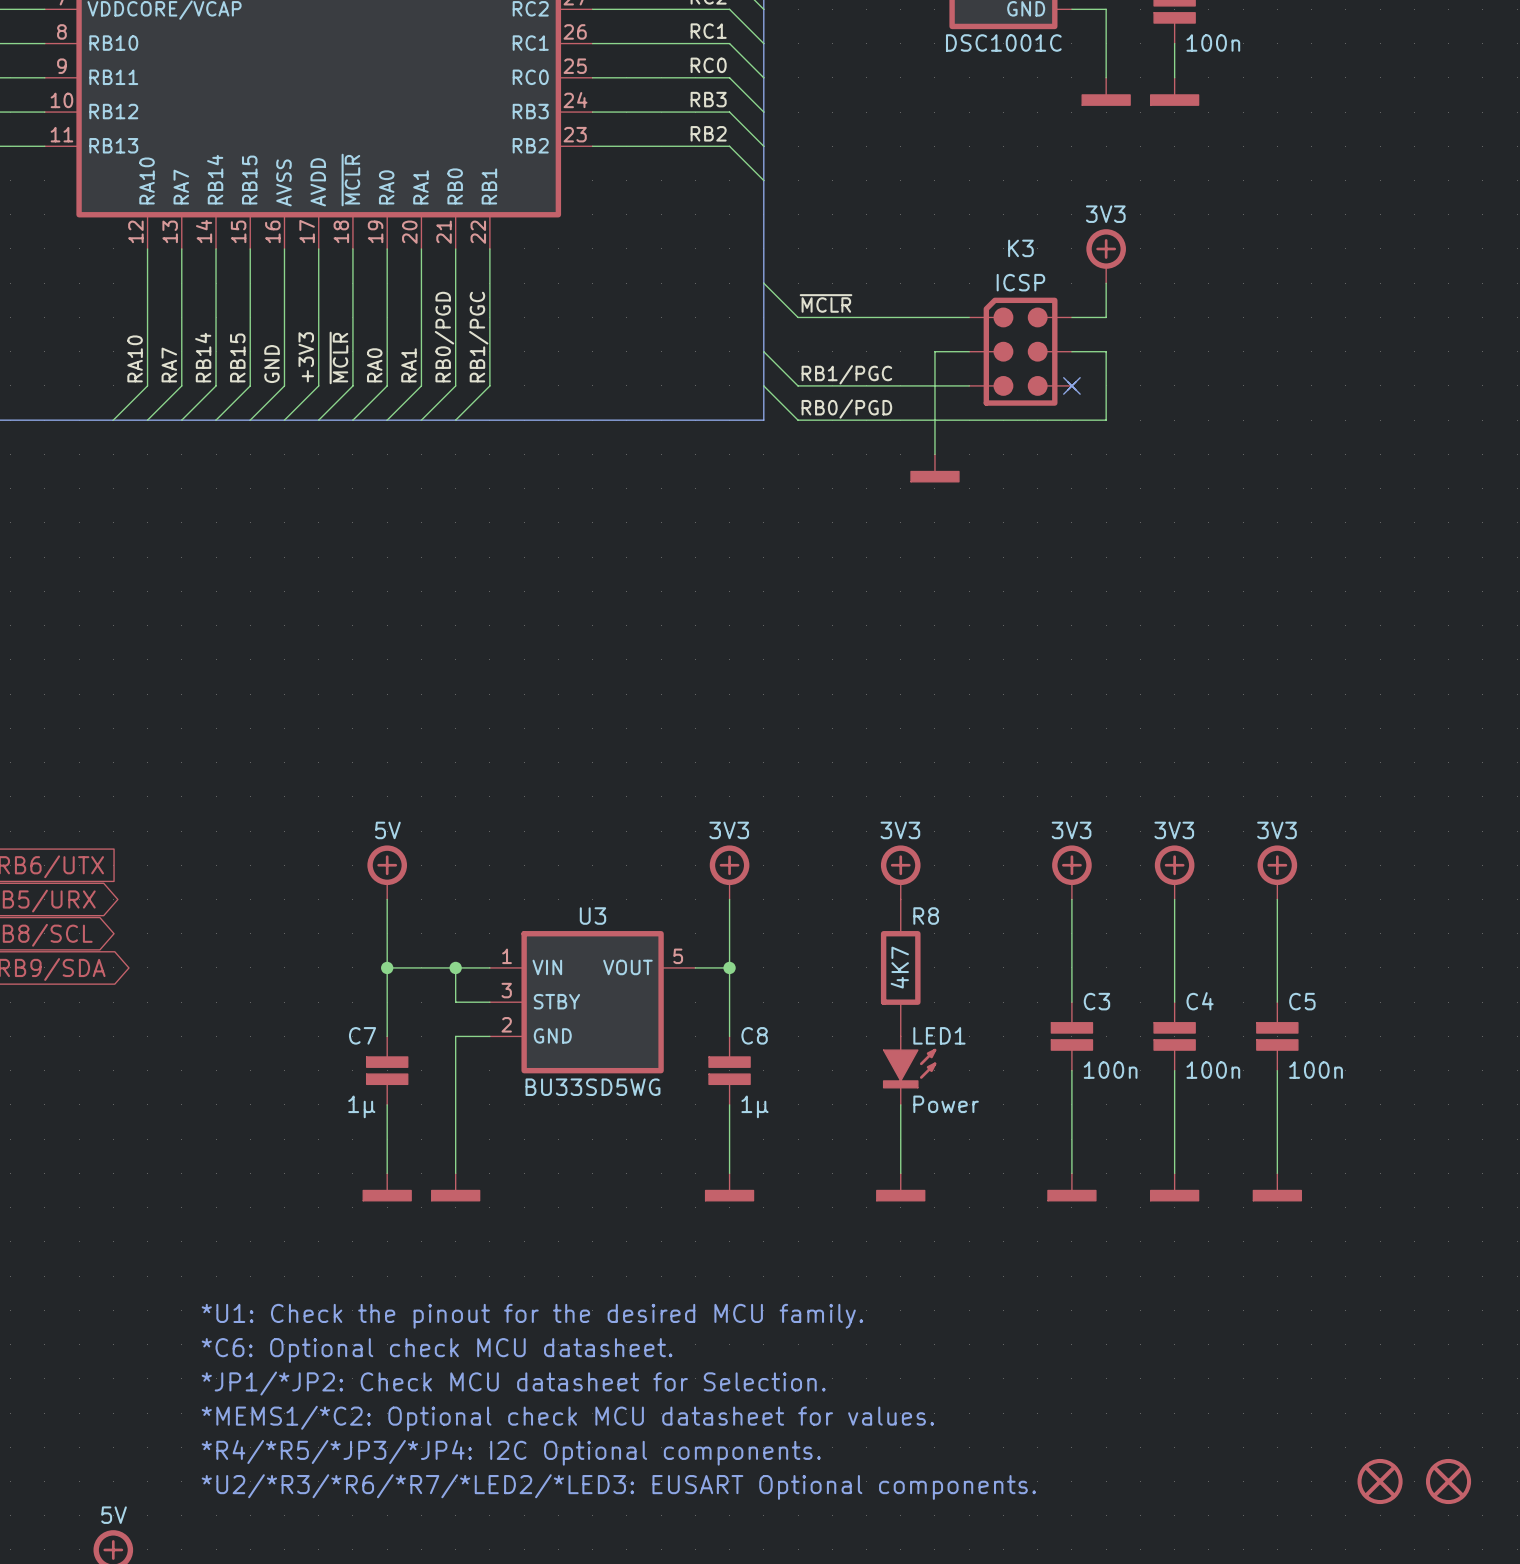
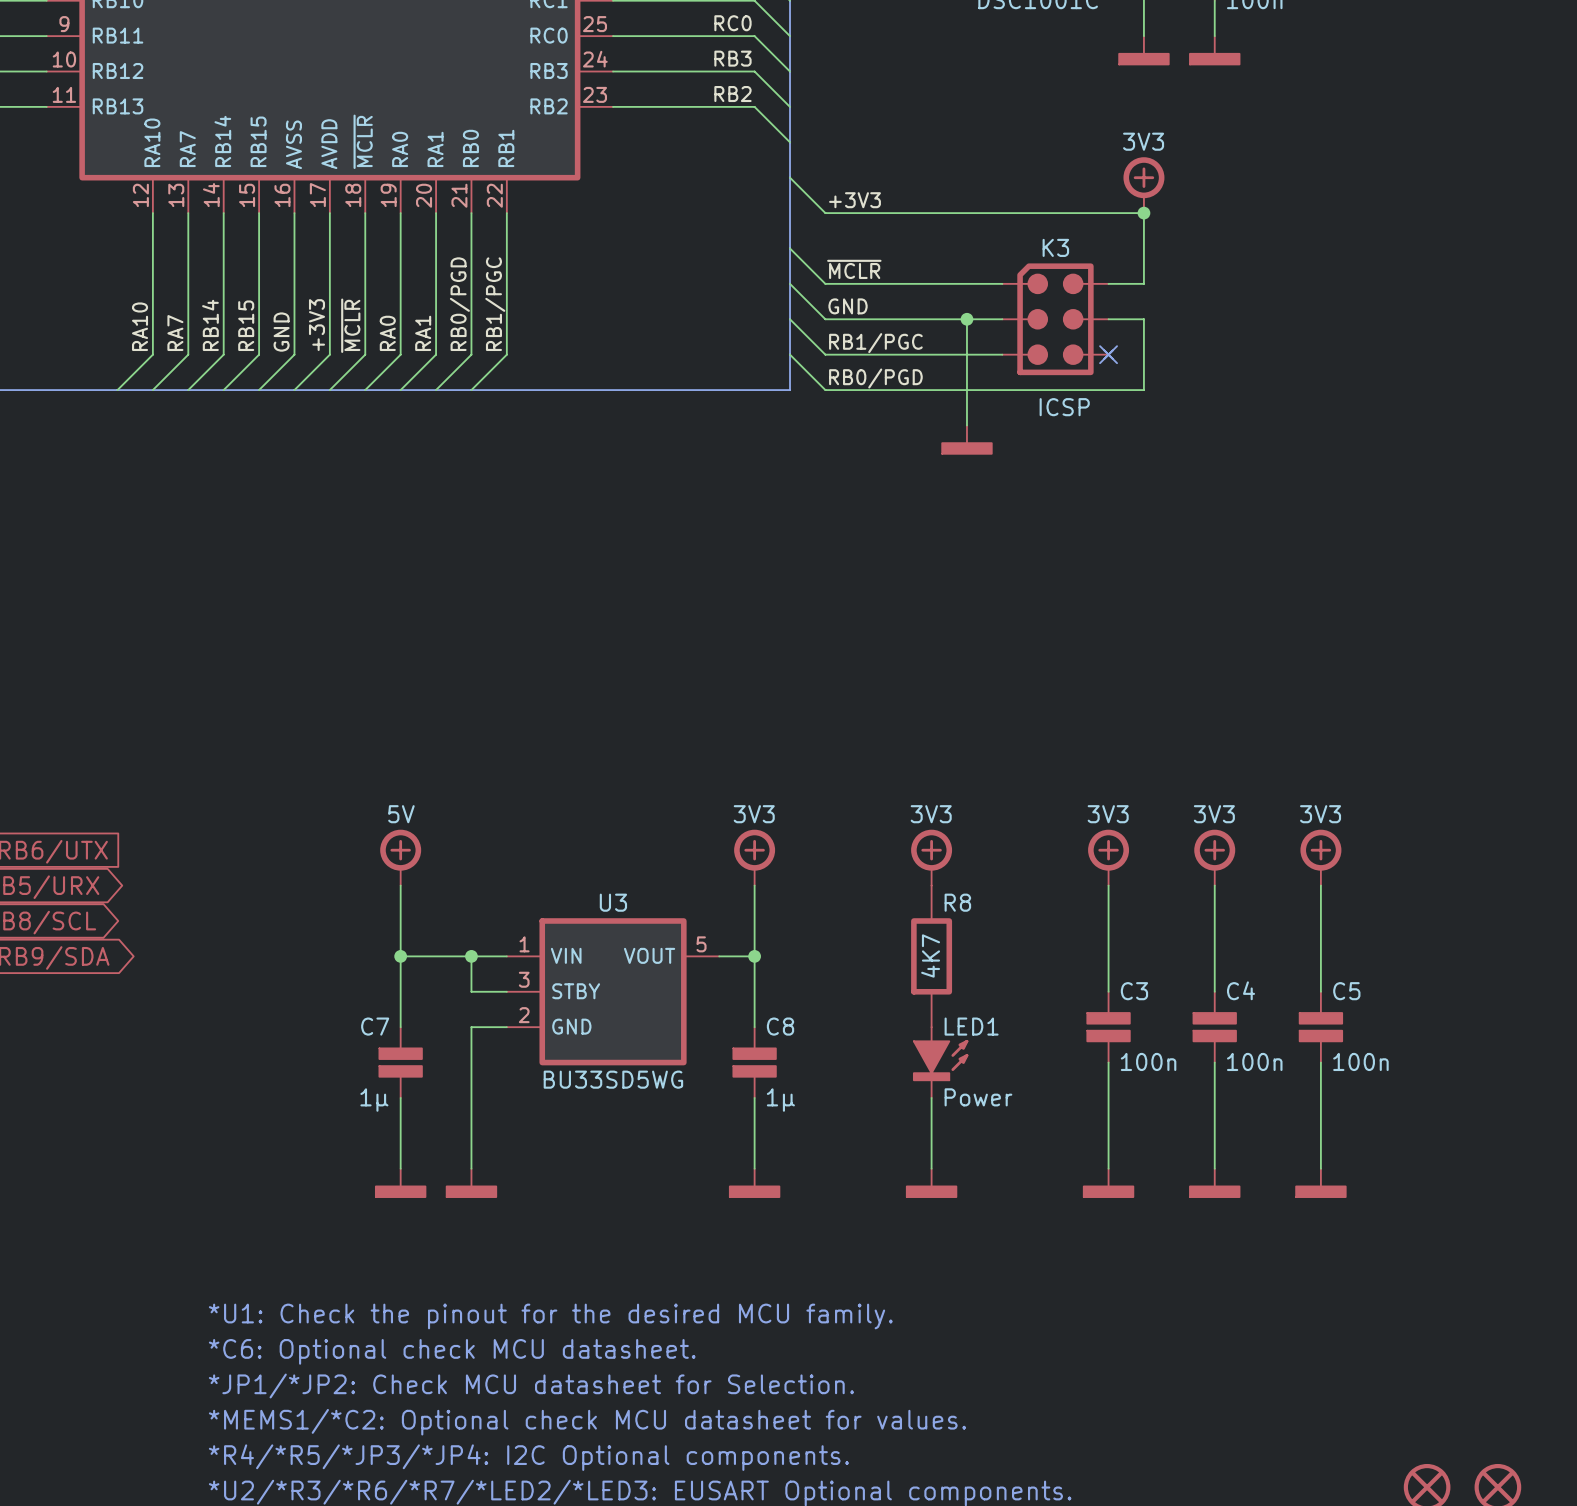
wire: none -> (790, 177) (825, 213) (1143, 213) (1143, 248)
label: none -> +3V3 (855, 200)
K3 name position: K3 (1020, 248) -> K3 (1055, 247)
junction: none -> (1143, 213)
power symbol position: (1106, 256) -> (1143, 185)
K3 value position: ICSP (1020, 282) -> ICSP (1064, 407)
wire: none -> (790, 283) (825, 319) (966, 319)
label: none -> GND (848, 306)
junction: none -> (966, 319)

